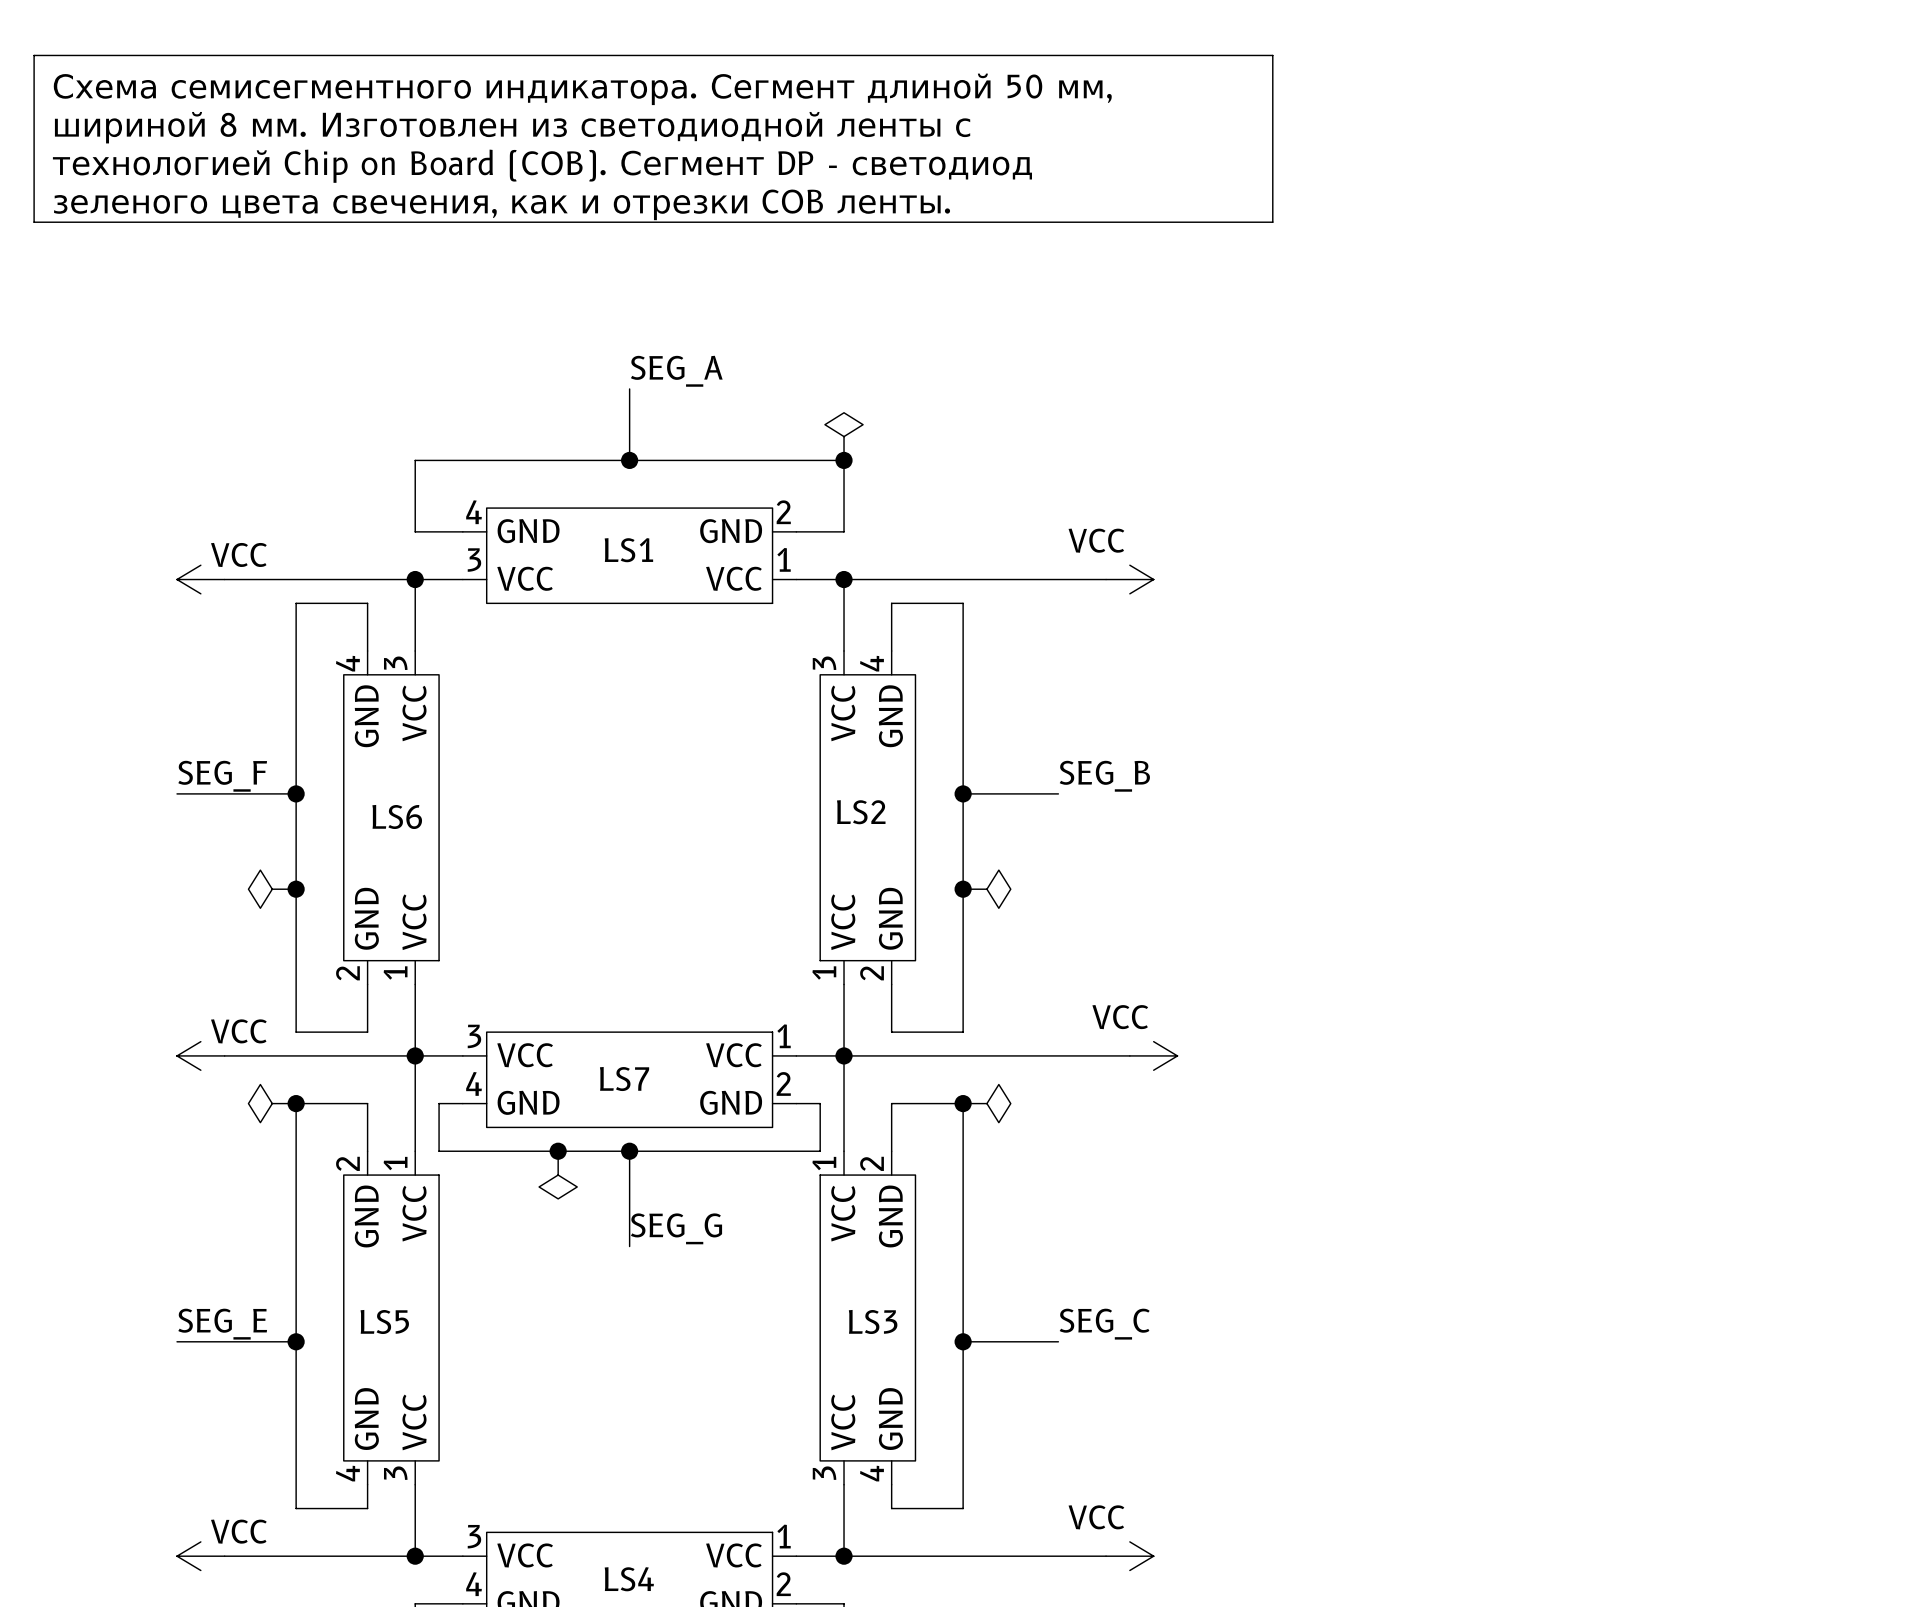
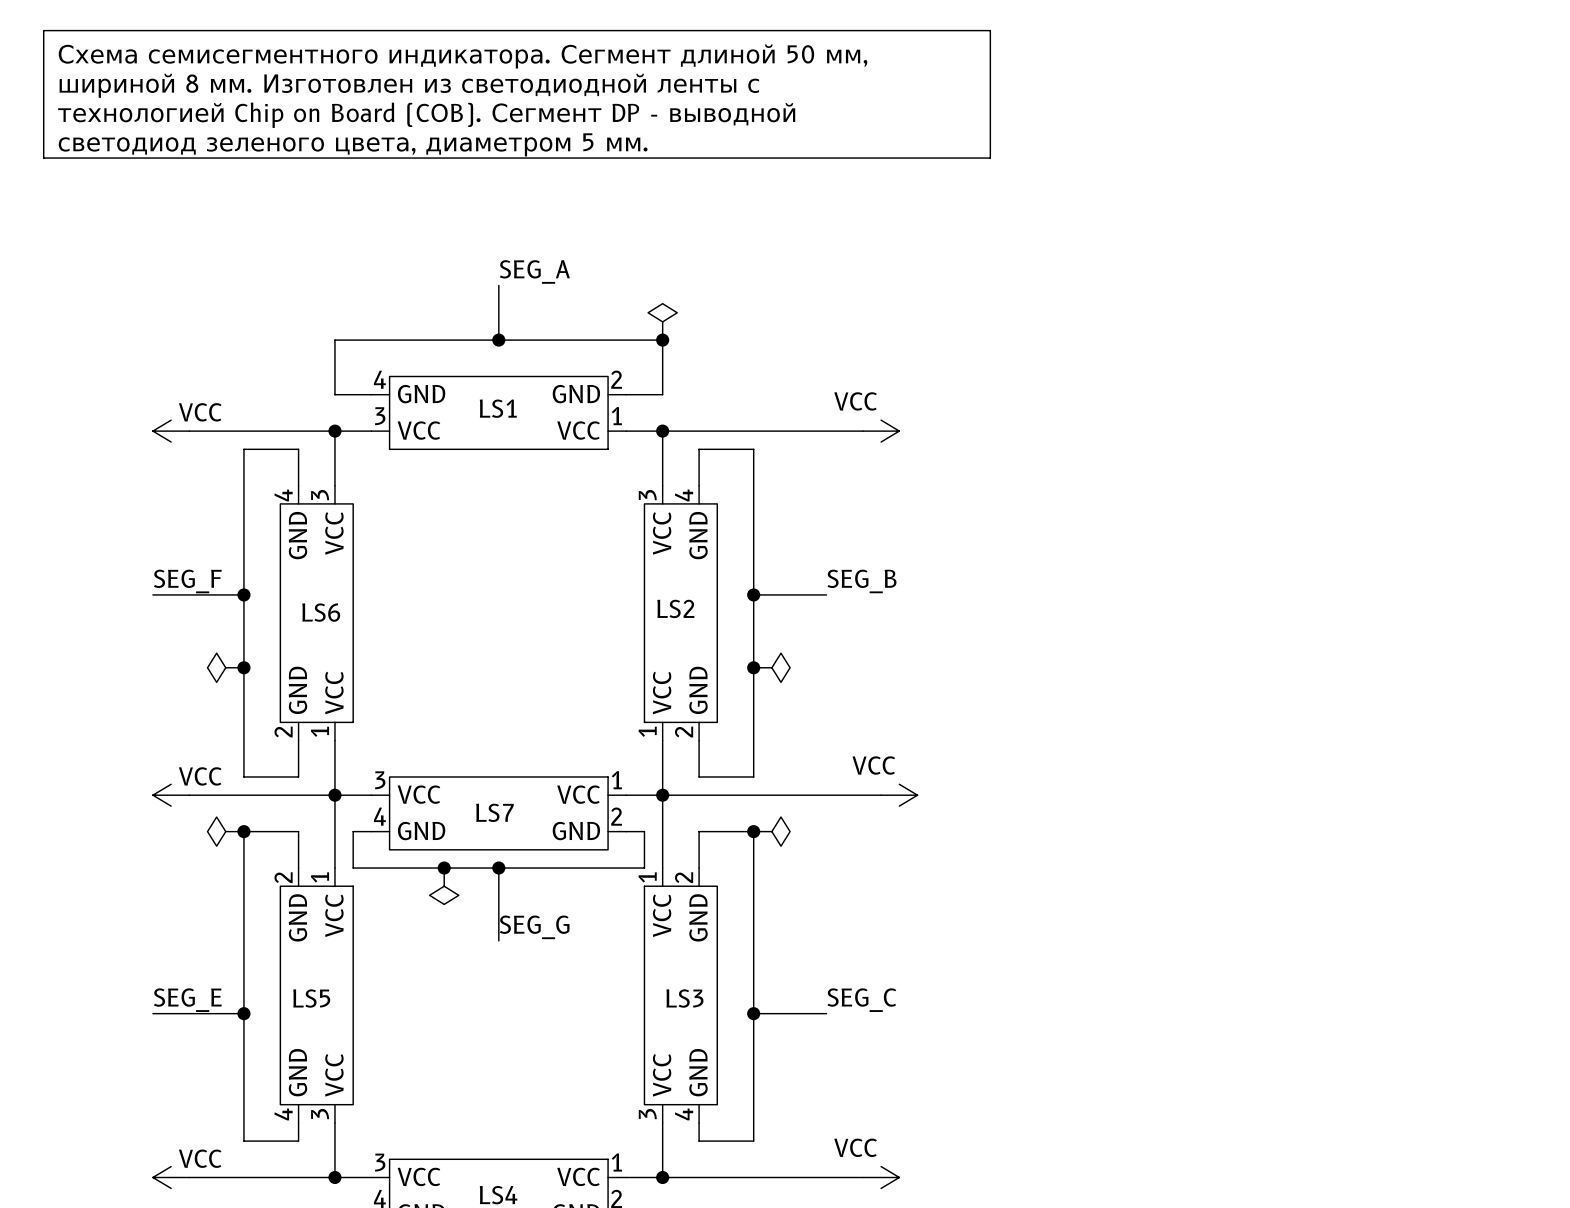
text: технологией Chip on Board (COB). Сегмент DP - светодиод (542, 166) -> технологией Chip on Board (COB). Сегмент DP - выводной (426, 115)
text: зеленого цвета свечения, как и отрезки COB ленты. (502, 204) -> светодиод зеленого цвета, диаметром 5 мм. (353, 144)

